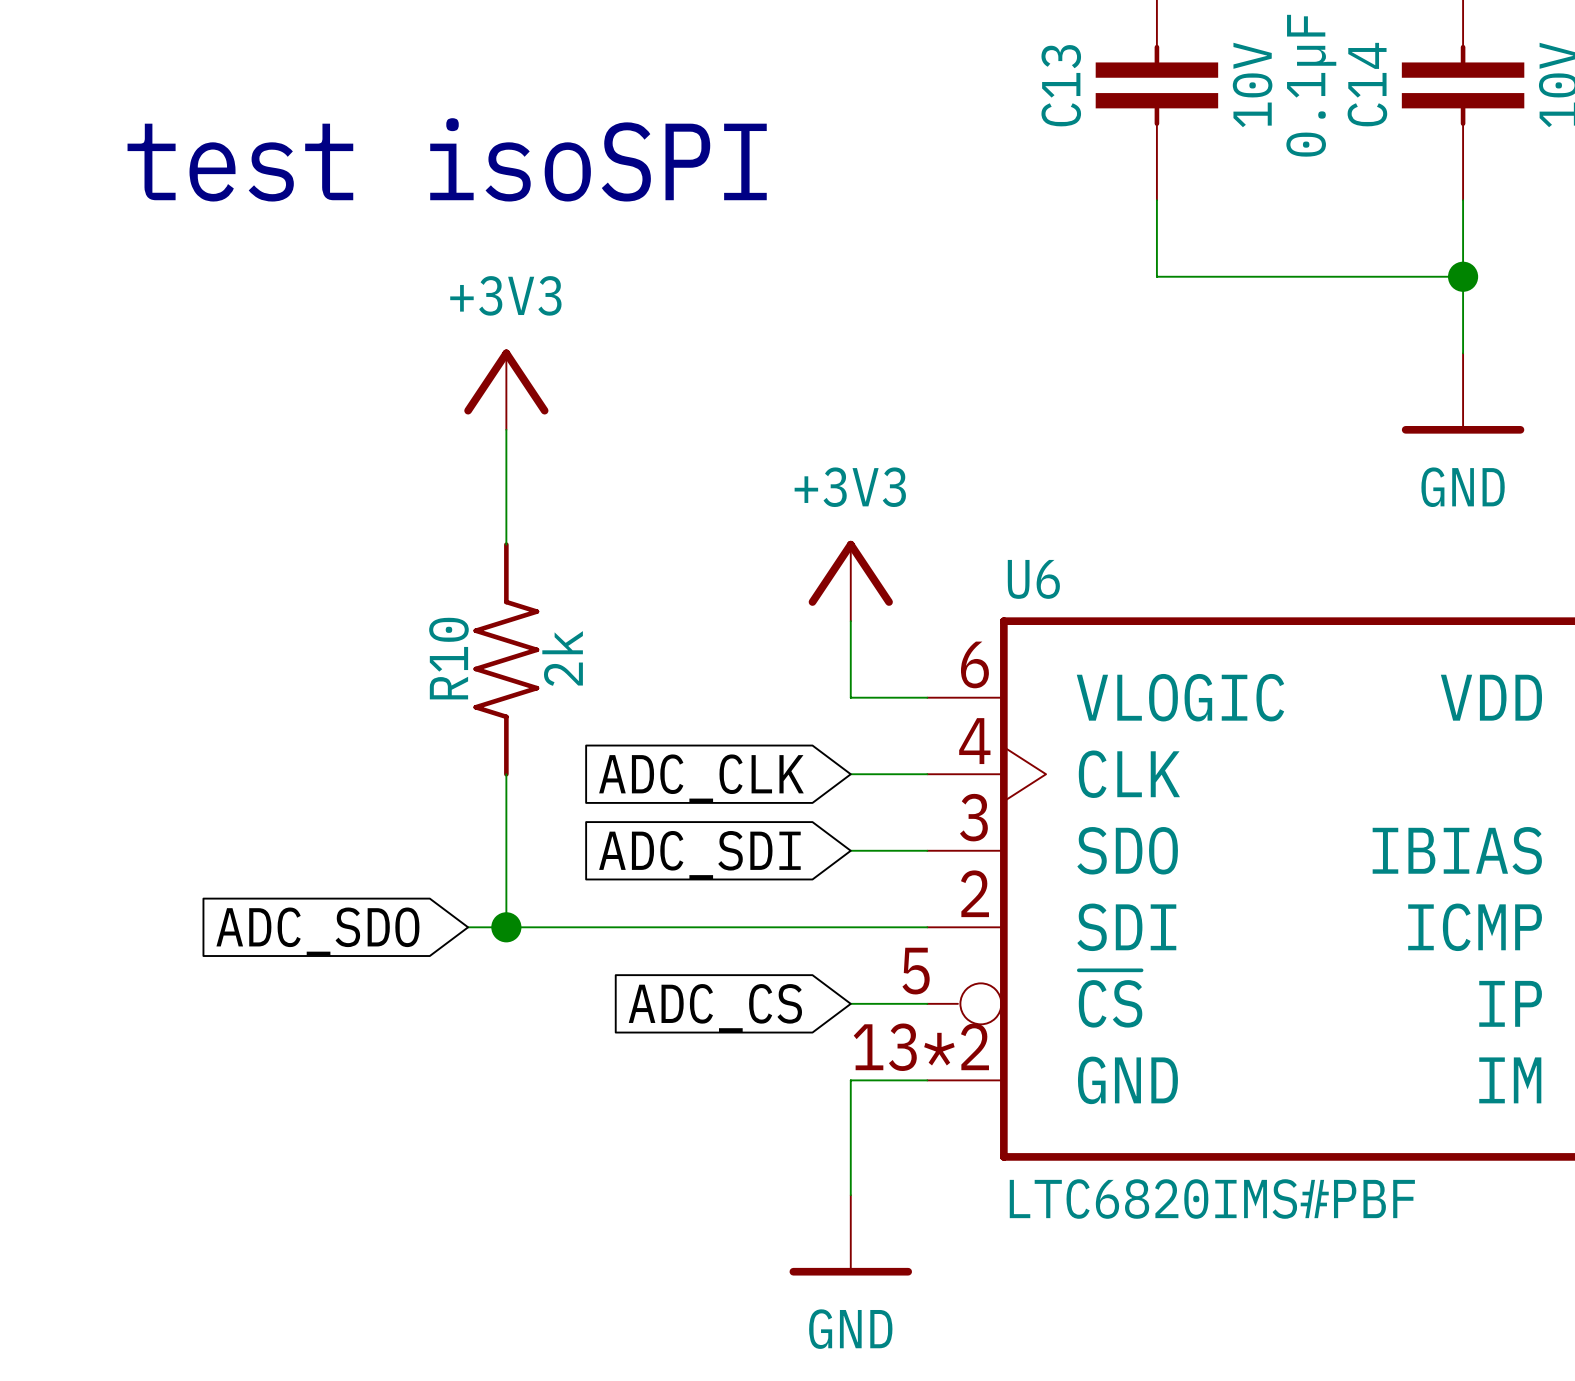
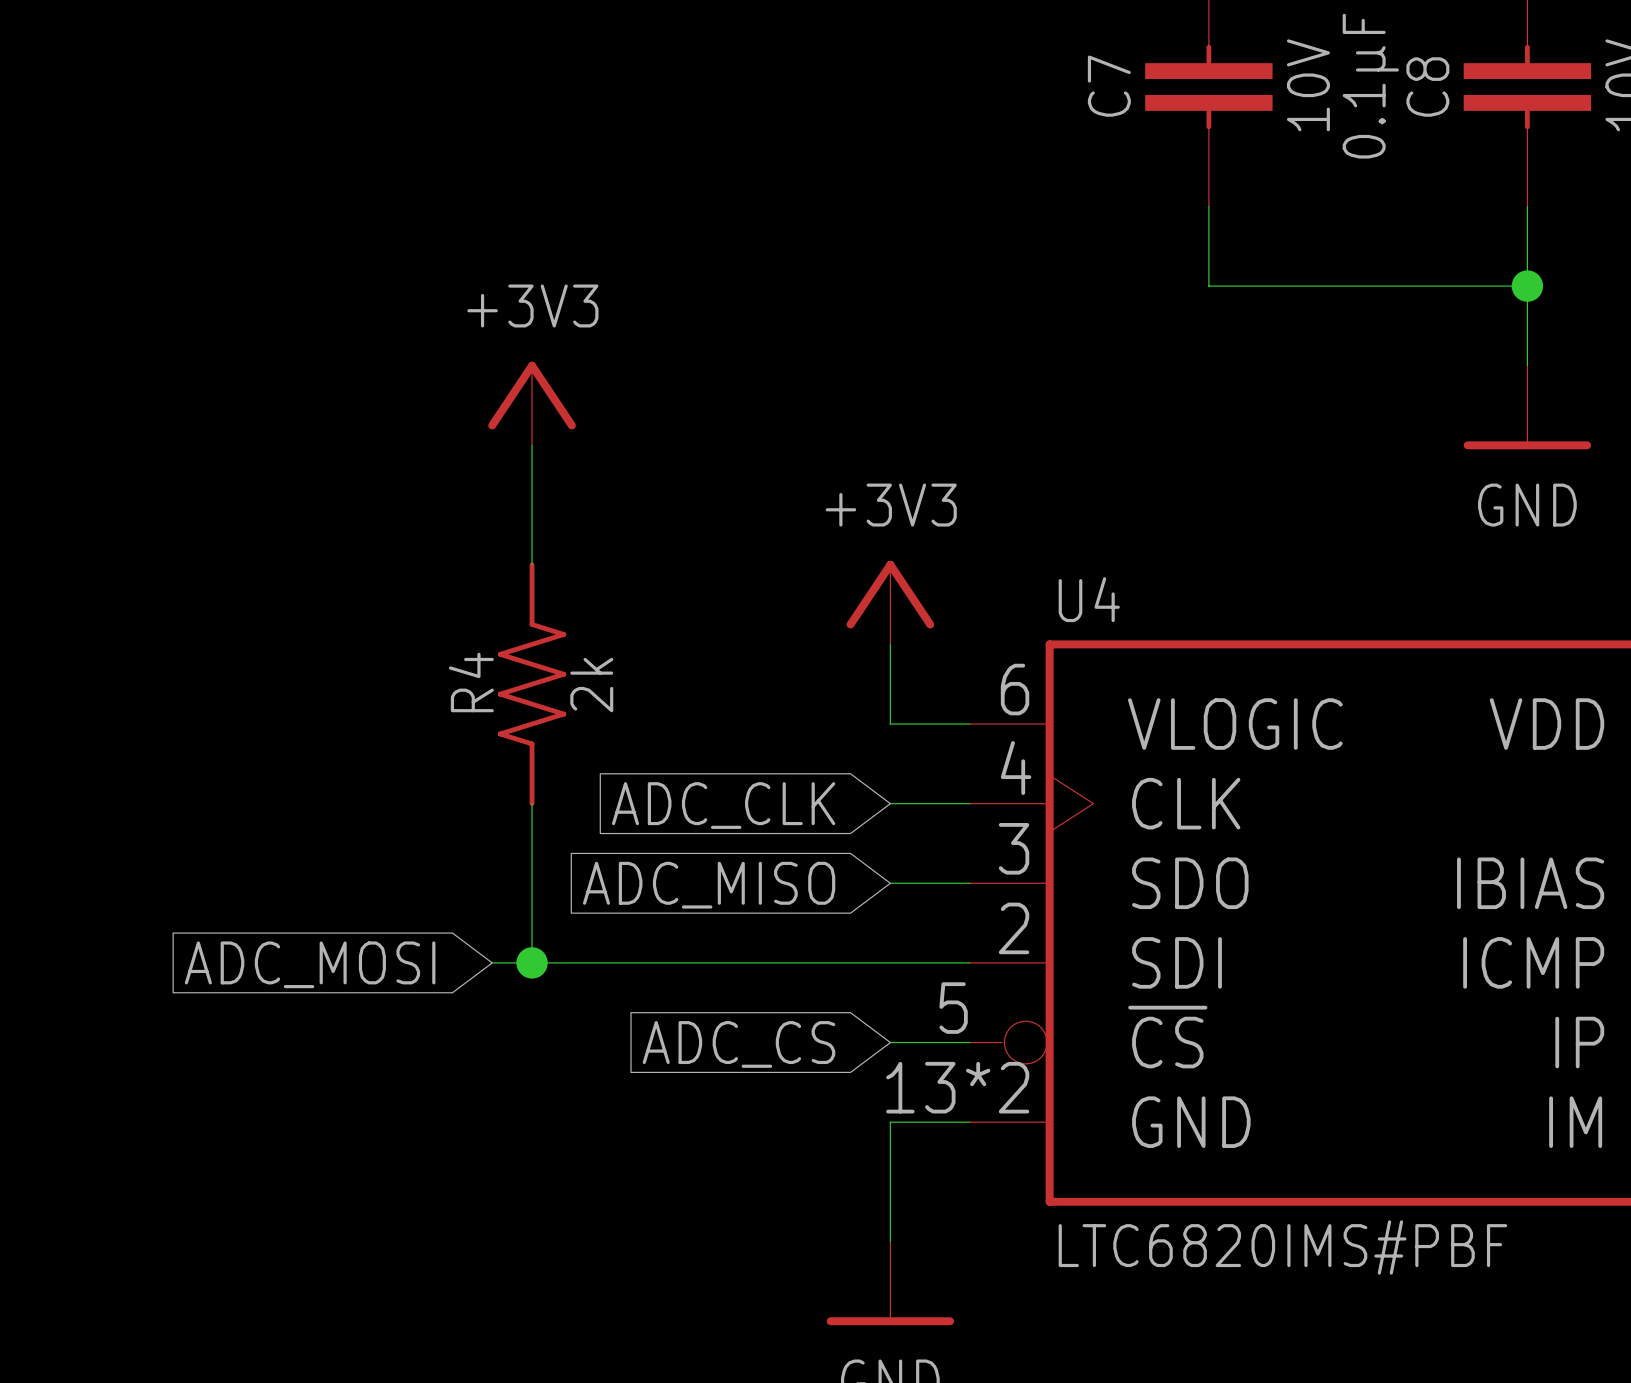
C14 name: C14 (1367, 84) -> C8 (1427, 87)
C13 name: C13 (1061, 85) -> C7 (1109, 86)
text: test isoSPI (447, 159) -> none
U6 name: U6 (1033, 579) -> U4 (1089, 599)
R10 name: R10 (448, 658) -> R4 (471, 682)
global label: ADC_SDI (699, 855) -> ADC_MISO (709, 885)
global label: ADC_SDO (317, 931) -> ADC_MOSI (310, 964)

